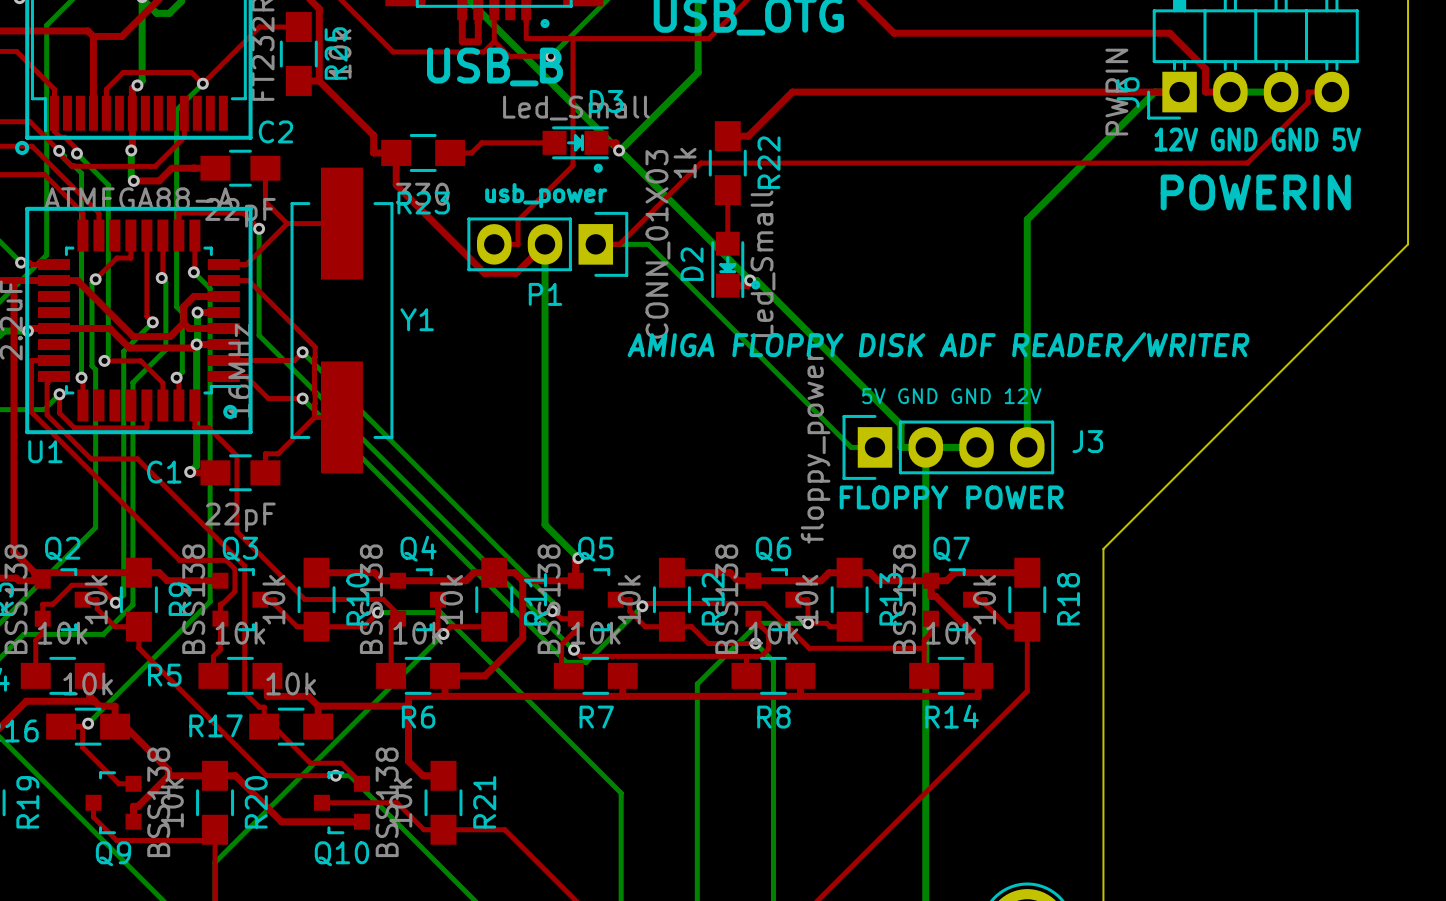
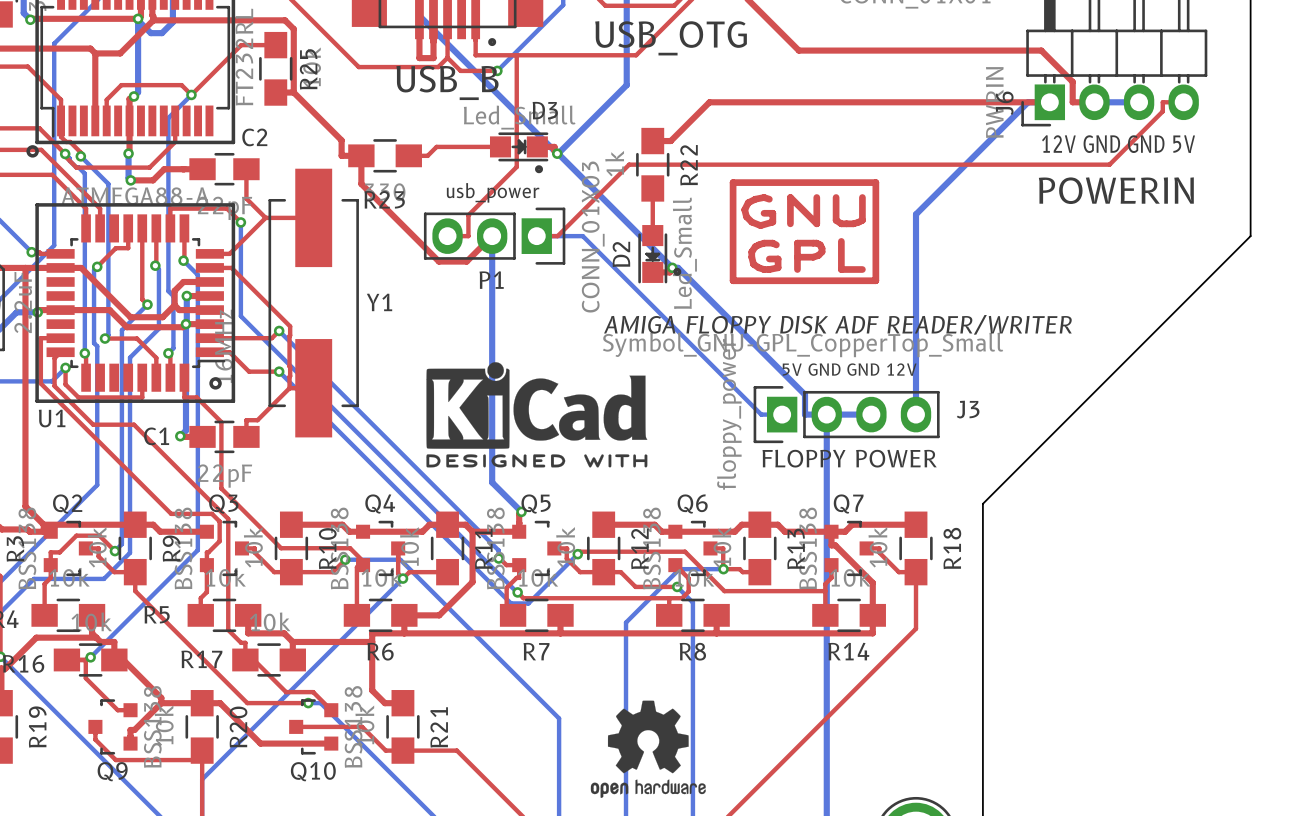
drawing: none -> [426, 179, 880, 468]
drawing: none -> [590, 700, 706, 798]

